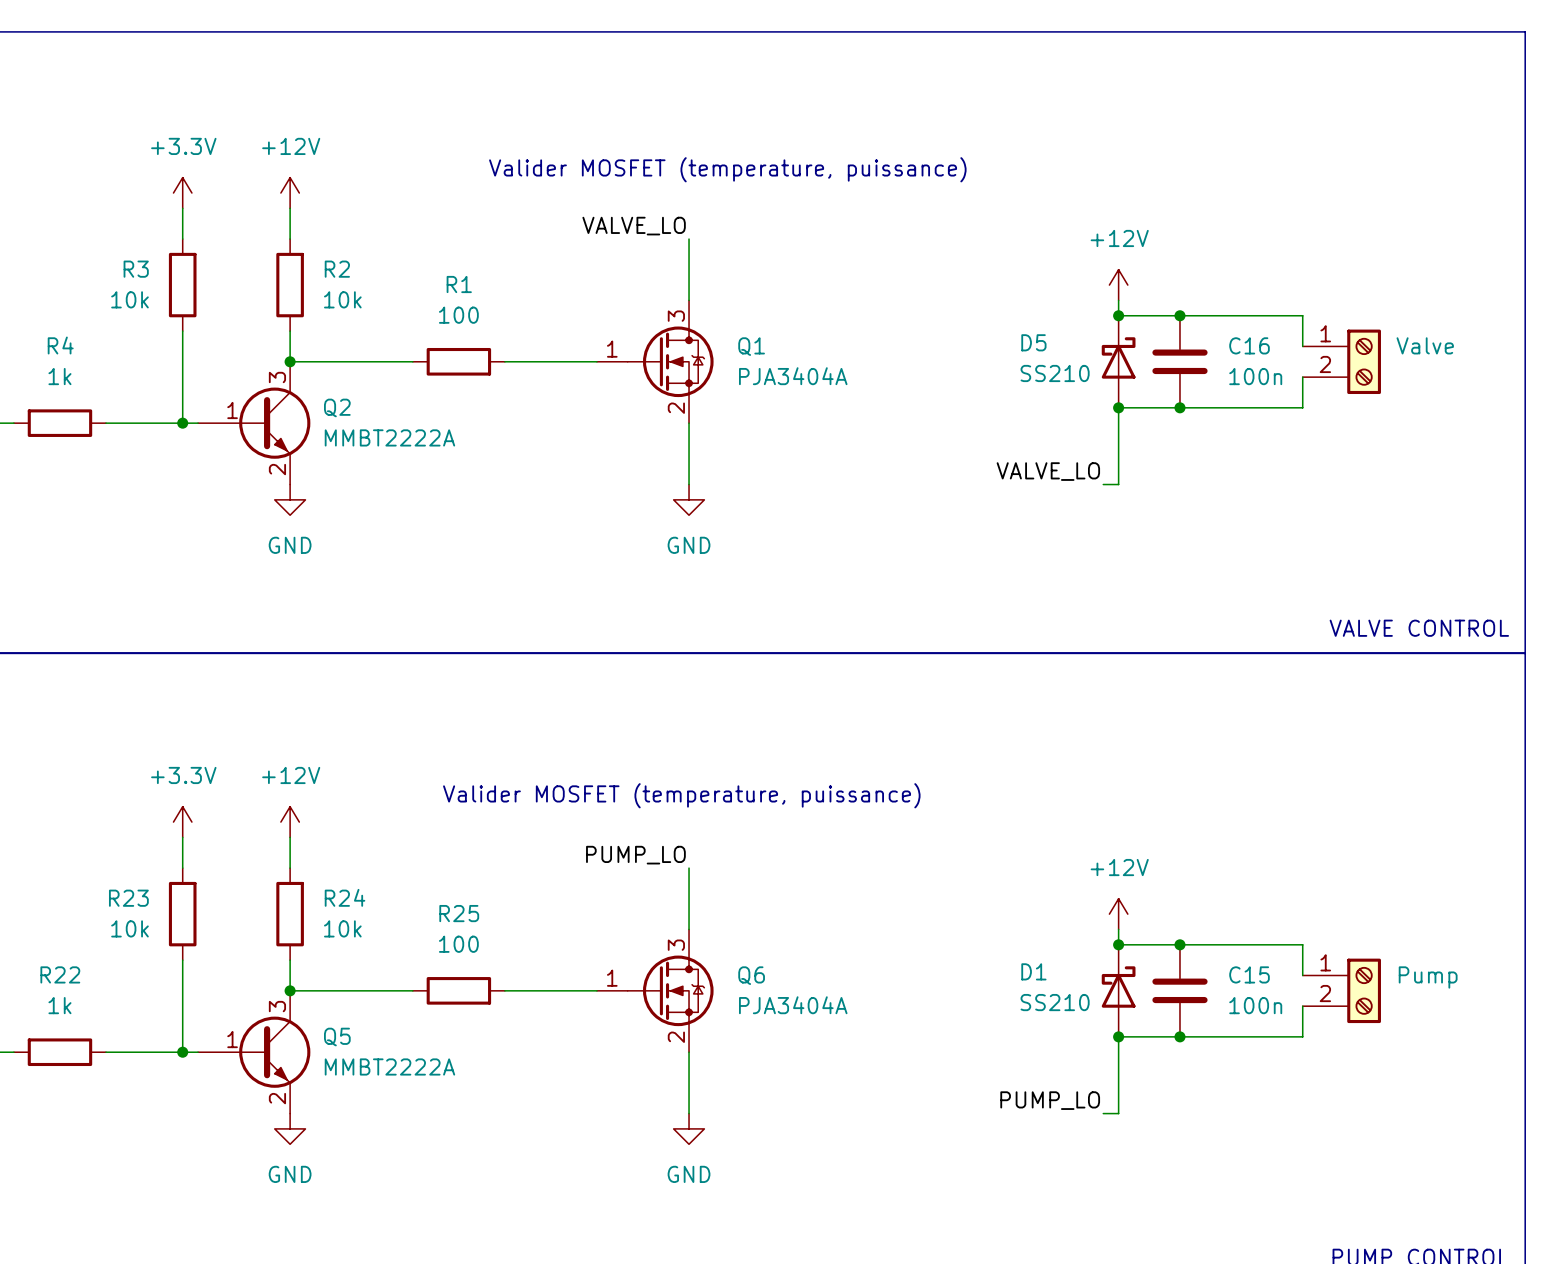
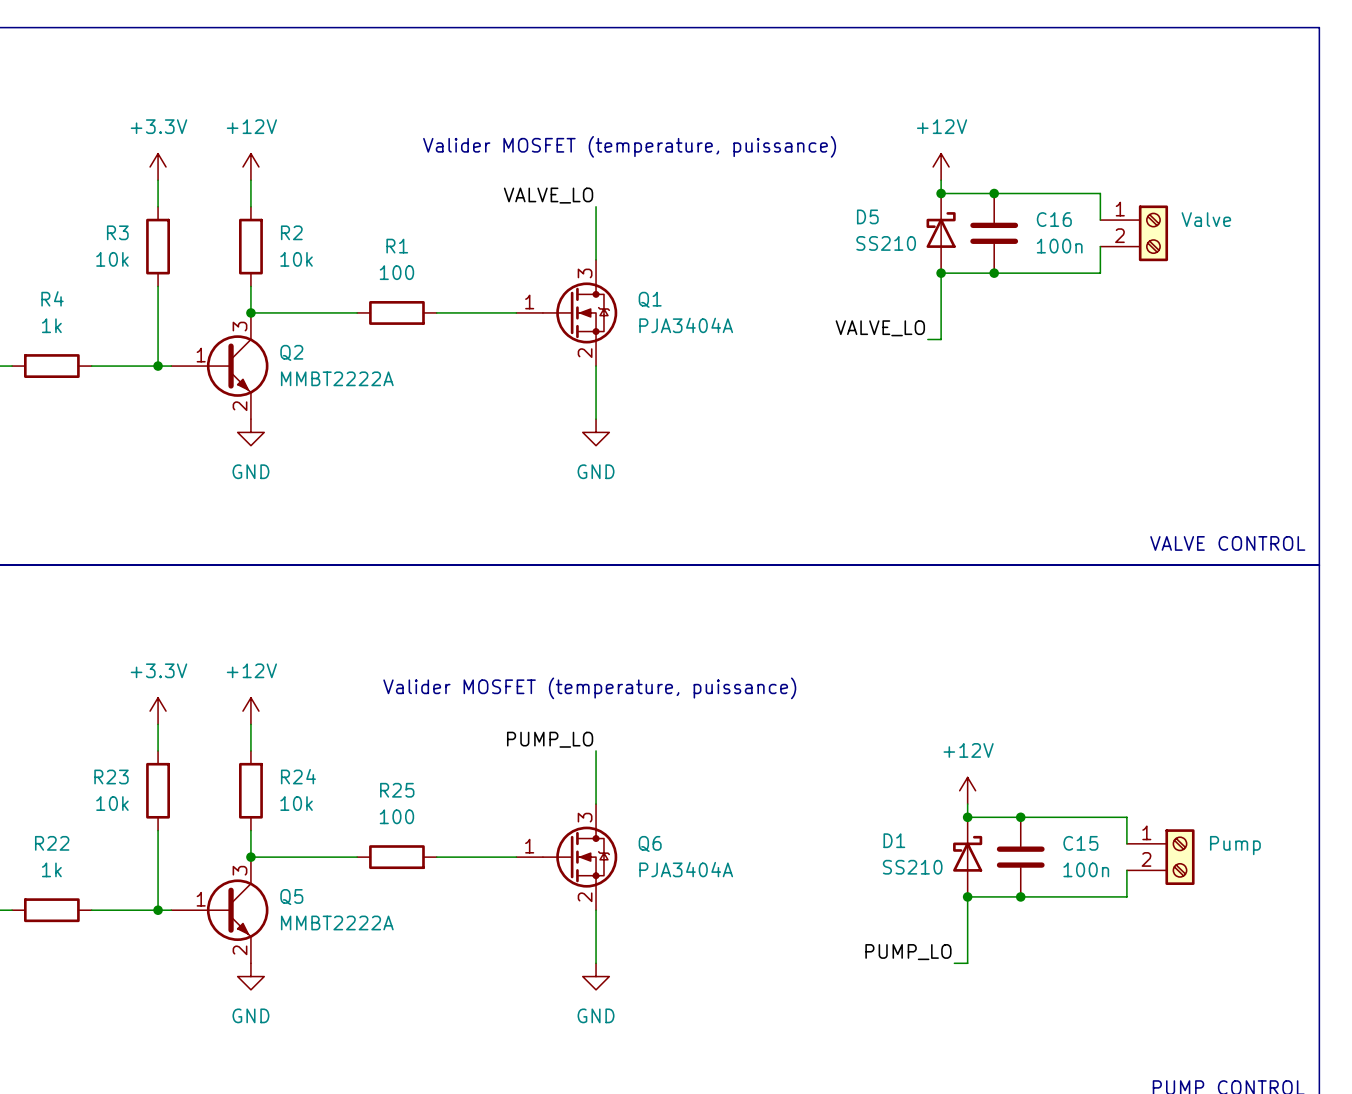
wire: none -> (941, 180) (941, 193) (1100, 193) (1100, 220)
junction: none -> (941, 193)
junction: none -> (994, 193)
power symbol position: +12V (1118, 285) -> +12V (941, 166)
wire: (1118, 300) (1118, 315) -> (927, 339) (941, 339) (941, 273) (967, 273)
junction: none -> (941, 273)
junction: (1118, 315) -> none
junction: none -> (994, 273)
junction: (1179, 315) -> none
wire: (1272, 315) (1302, 315) (1302, 346) -> (1100, 273) (1100, 246)
D5 position: (1118, 361) -> (941, 233)
C16 position: (1179, 361) -> (994, 233)
Valve position: (1341, 361) -> (1134, 233)
wire: (1302, 377) (1302, 407) (1118, 407) (1118, 484) (1103, 484) -> none
junction: (1118, 407) -> none
junction: (1179, 407) -> none
label position: VALVE_LO (1048, 471) -> VALVE_LO (880, 328)

